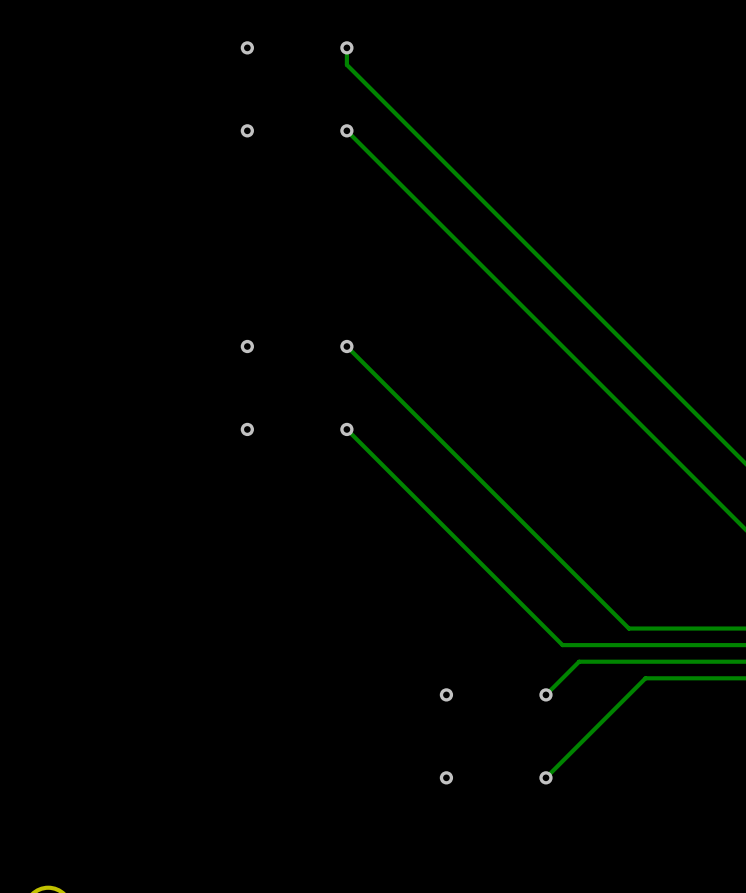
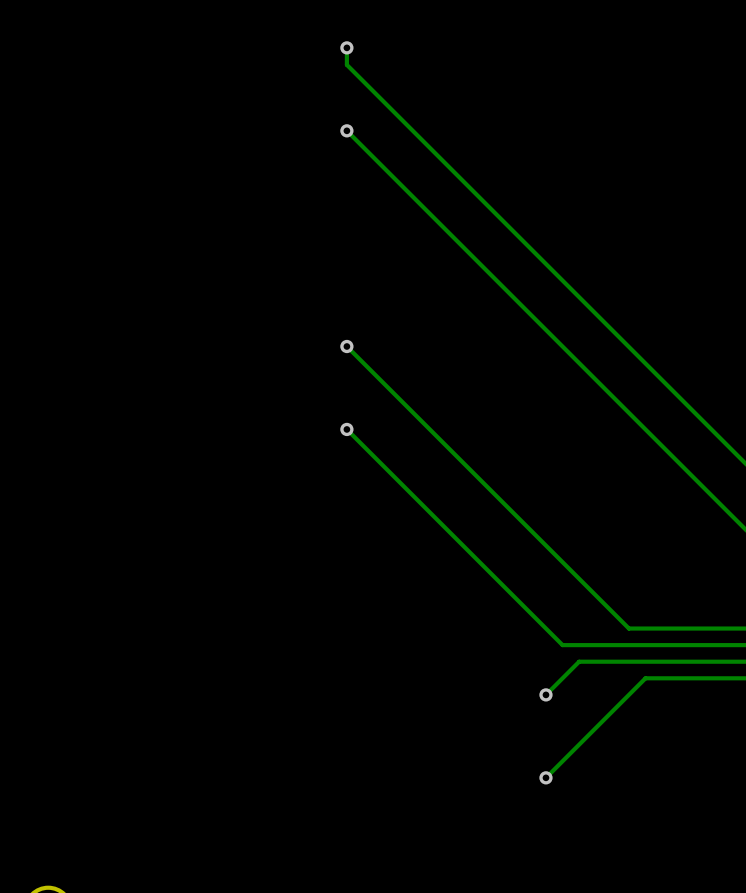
via: (247, 47) -> none
via: (247, 130) -> none
via: (247, 346) -> none
via: (247, 429) -> none
via: (446, 694) -> none
via: (446, 777) -> none

